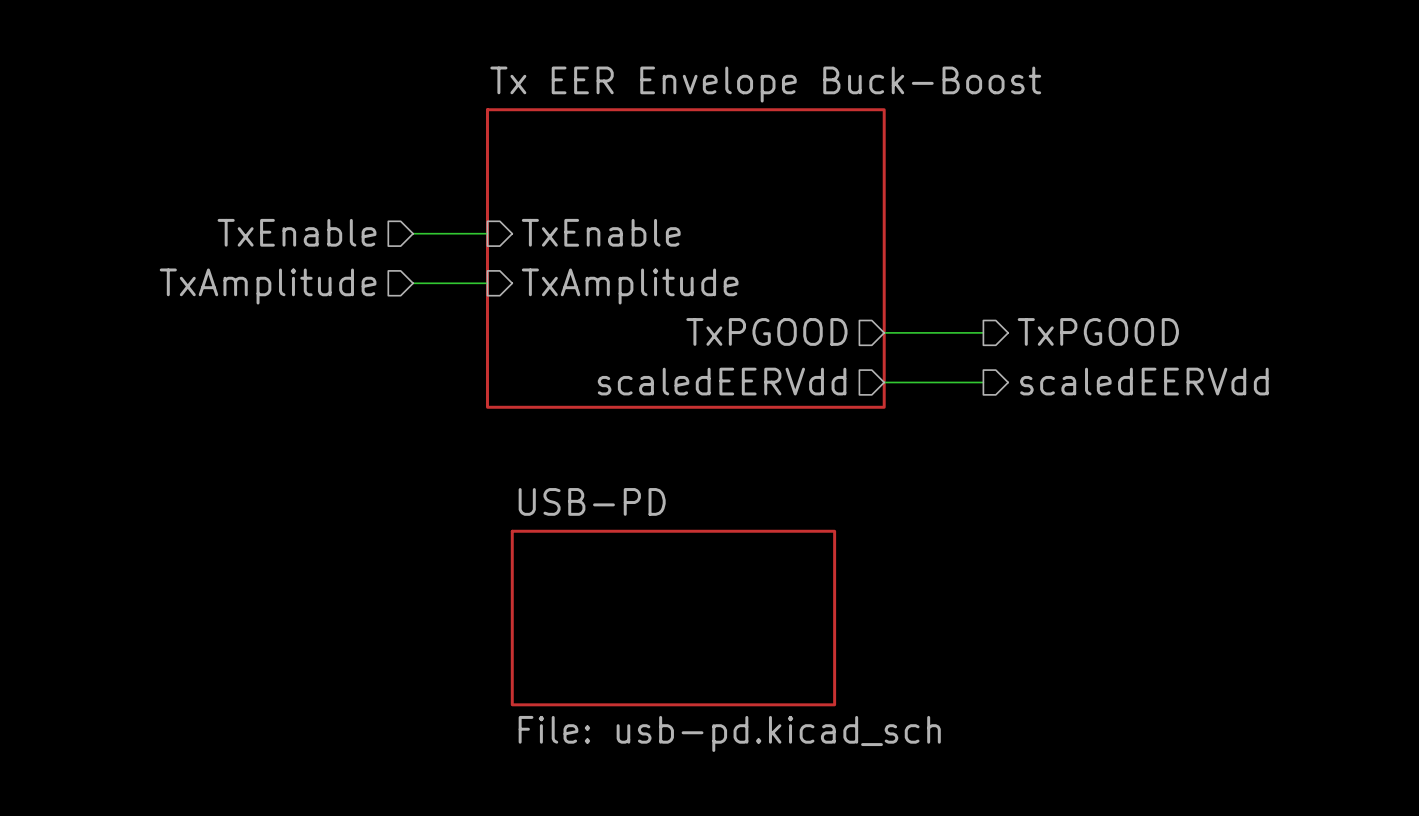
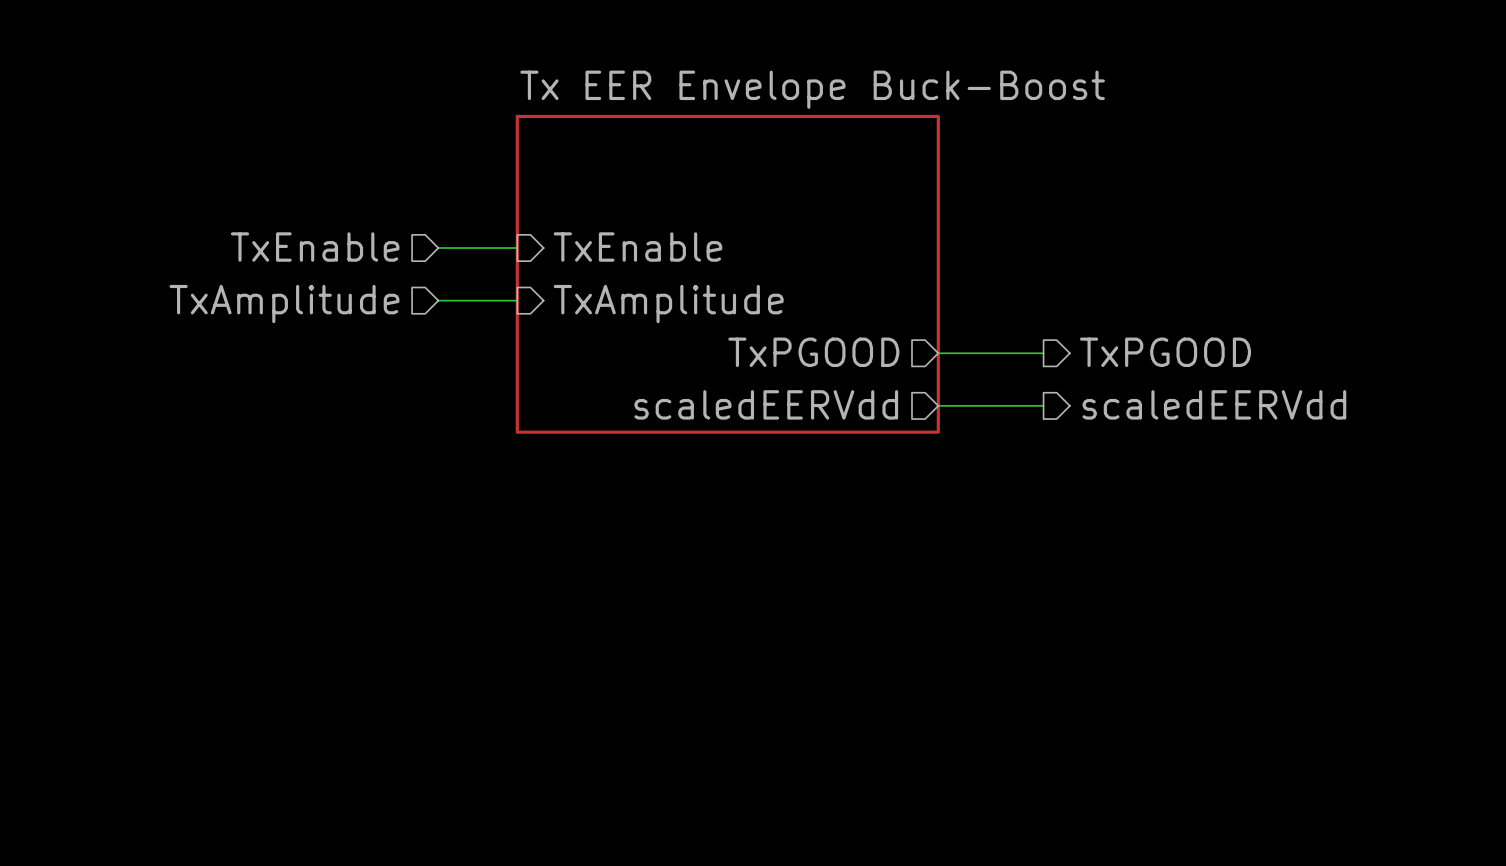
sheet USB-PD: File: usb-pd.kicad_sch (673, 618) -> none

